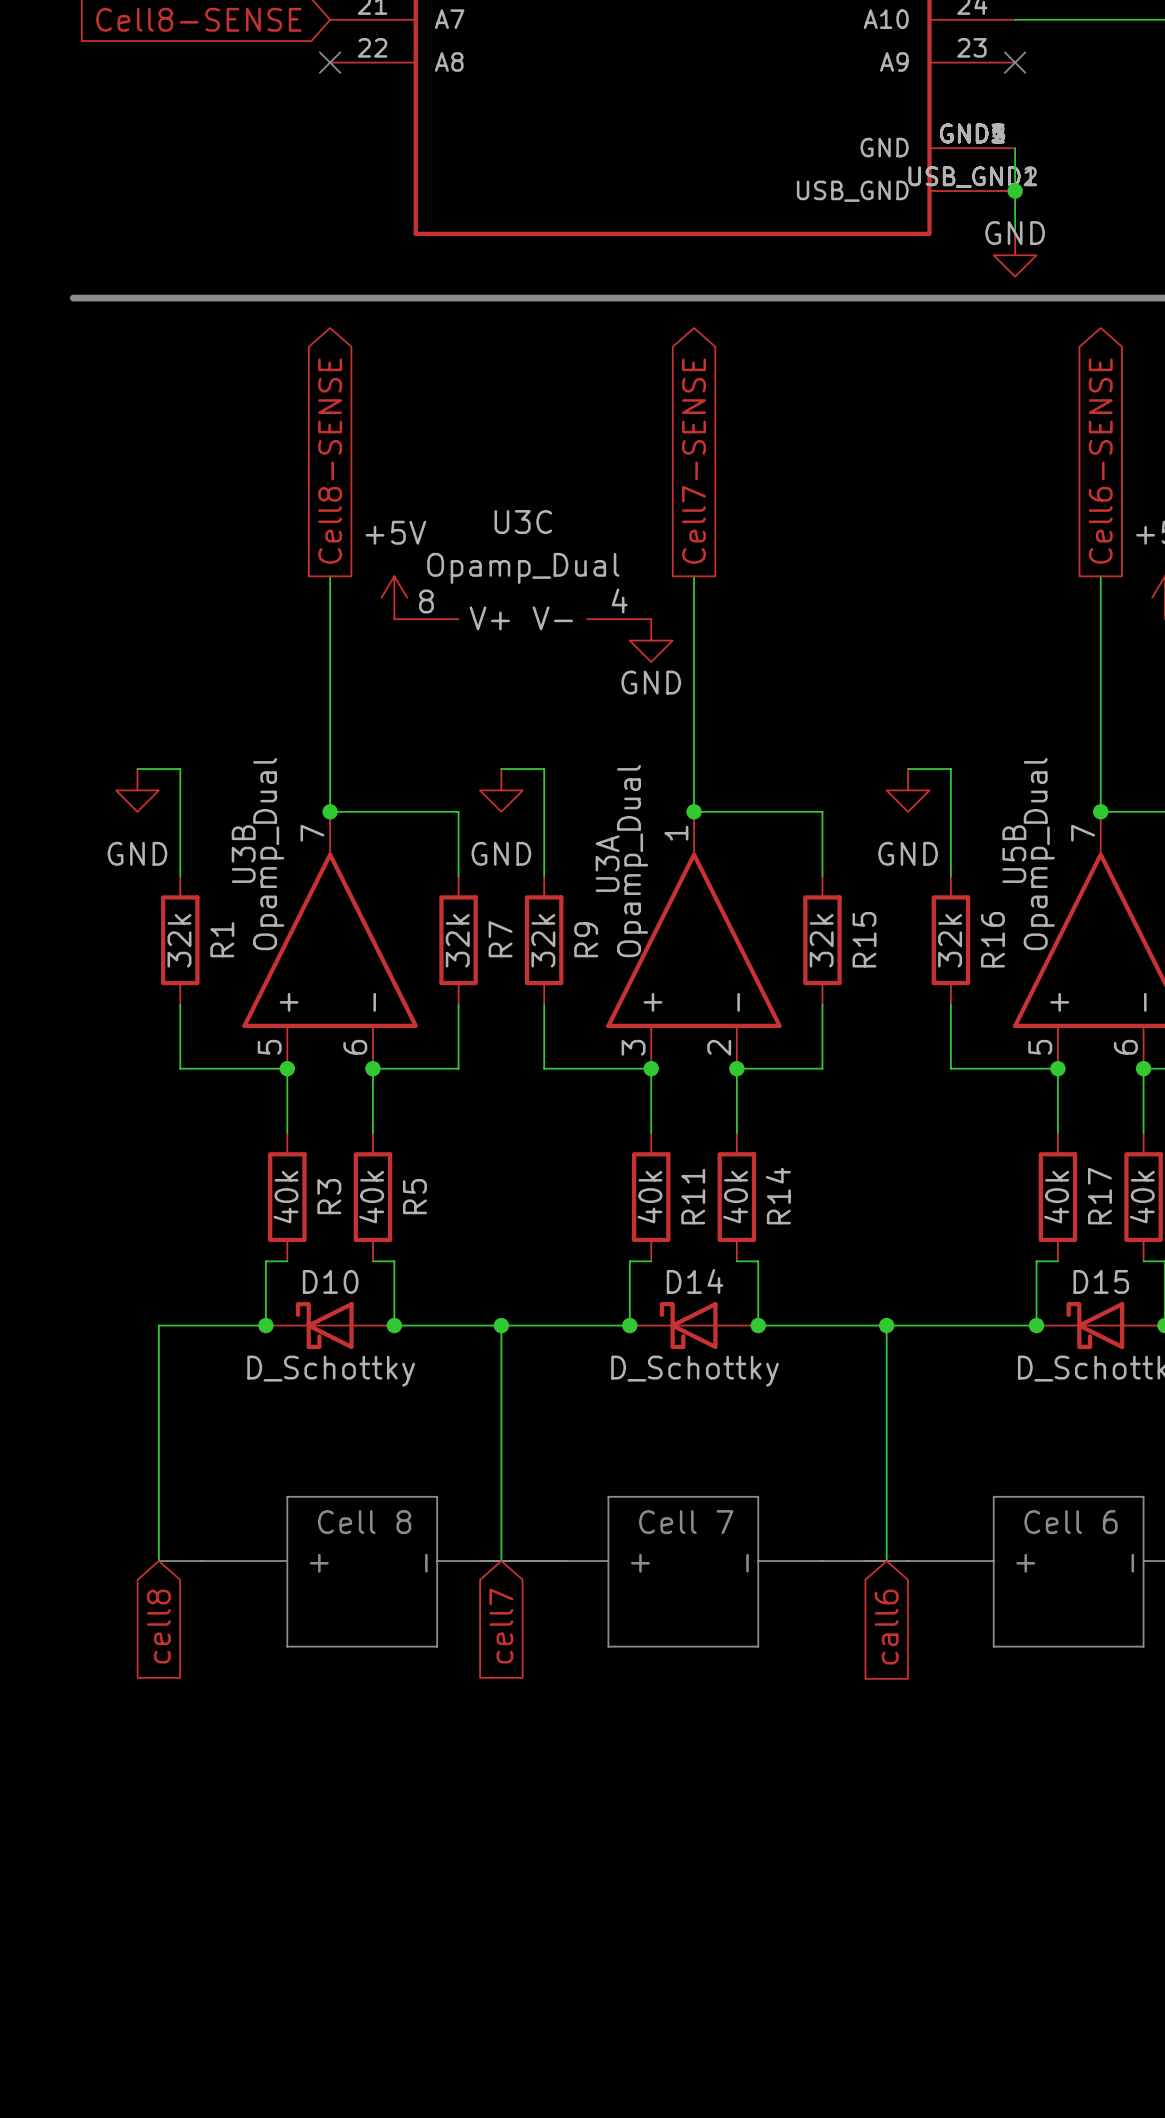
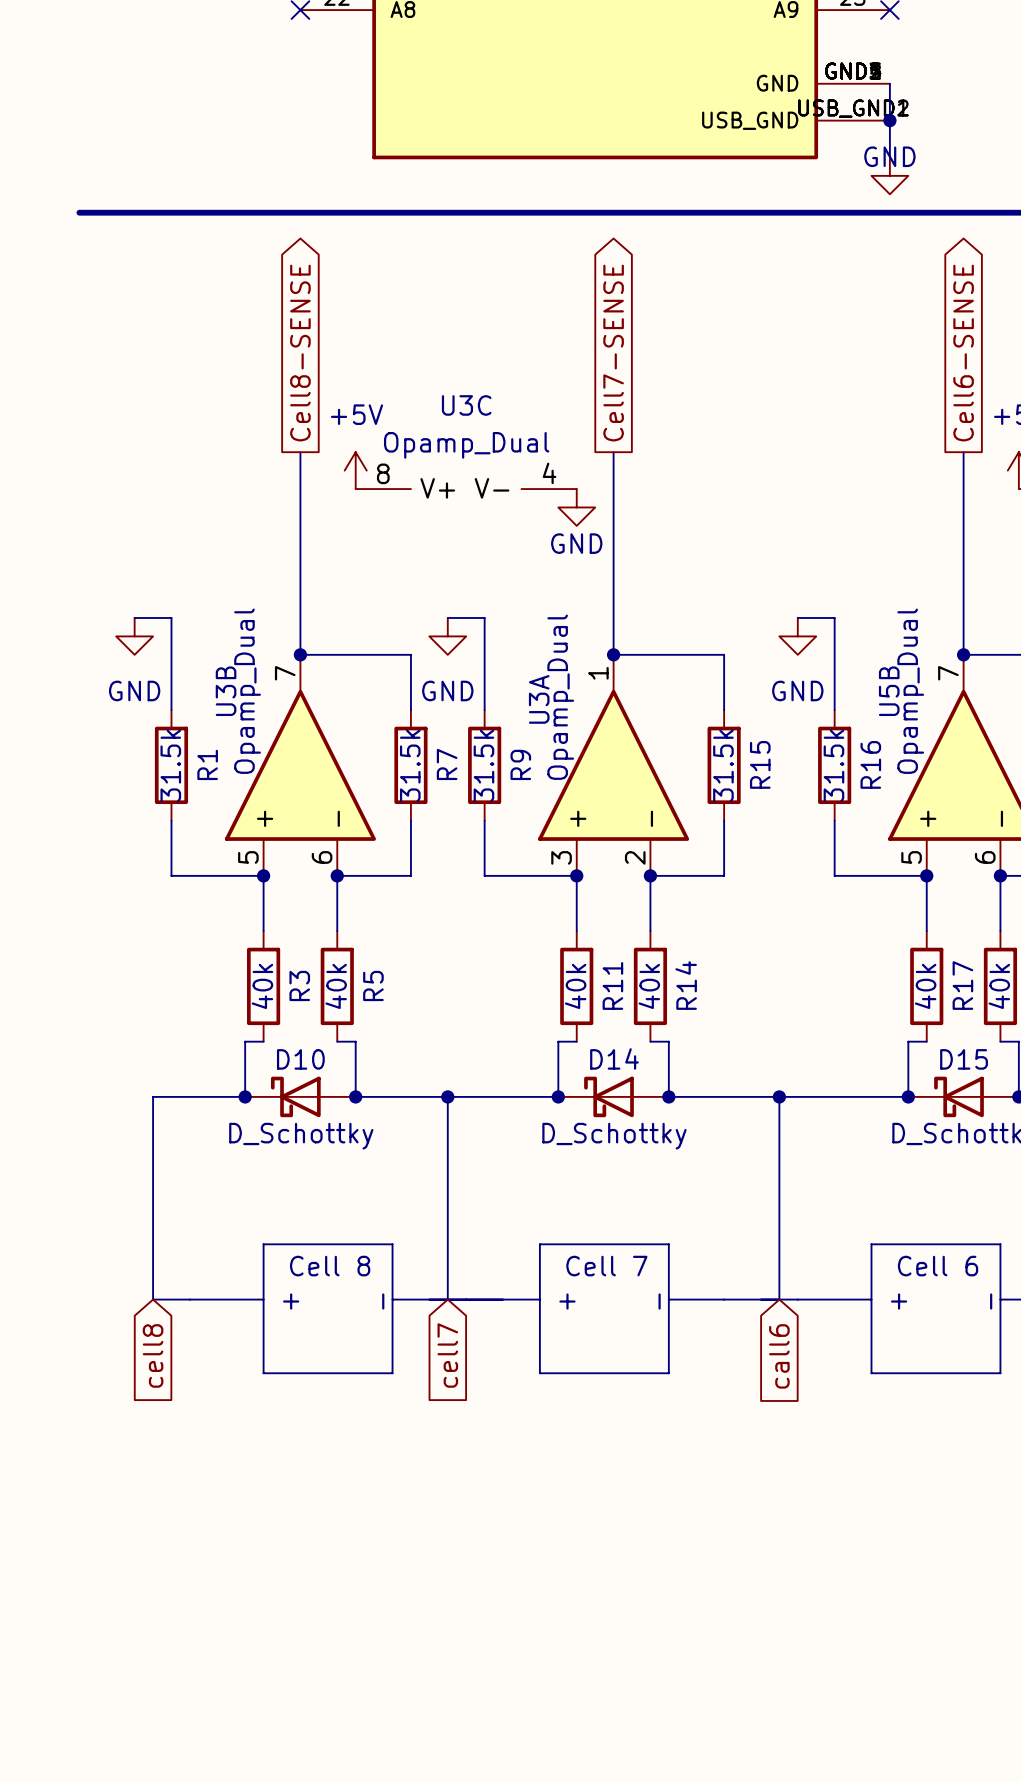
R1 value: 32k (179, 940) -> 31.5k (170, 765)
R7 value: 32k (457, 940) -> 31.5k (410, 765)
R9 value: 32k (543, 940) -> 31.5k (483, 765)
R15 value: 32k (821, 940) -> 31.5k (723, 765)
R16 value: 32k (950, 940) -> 31.5k (833, 765)

